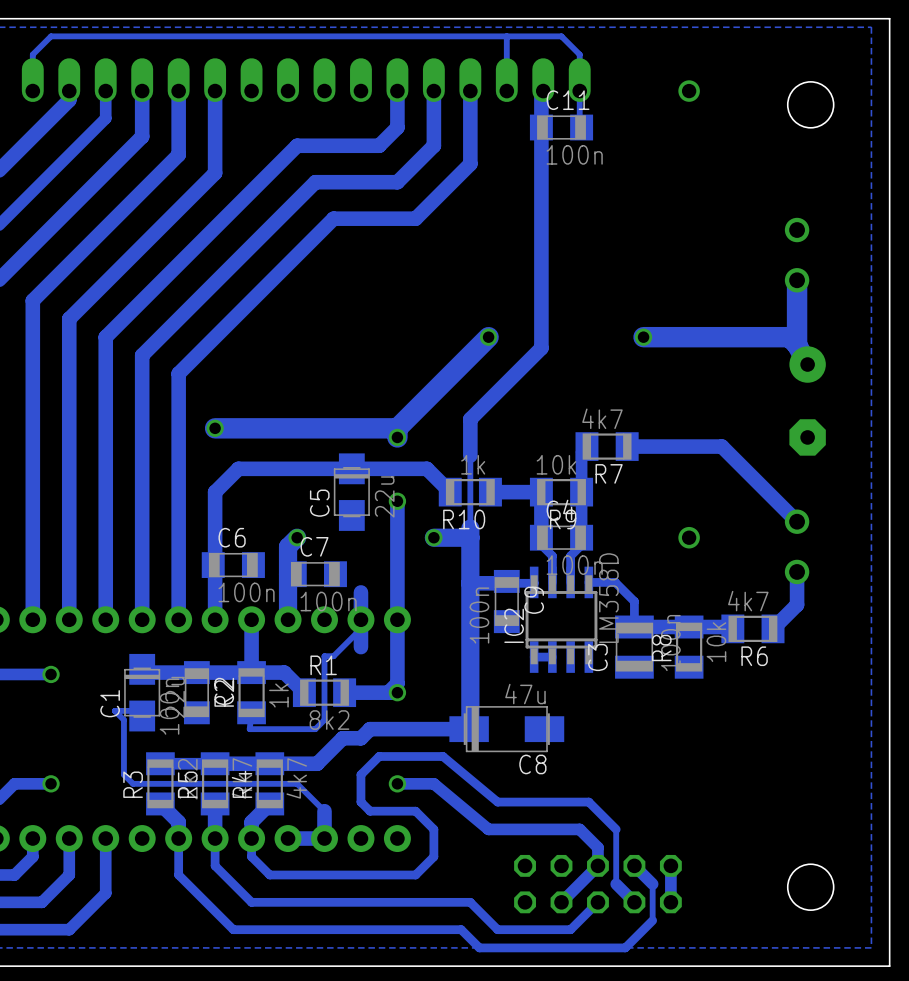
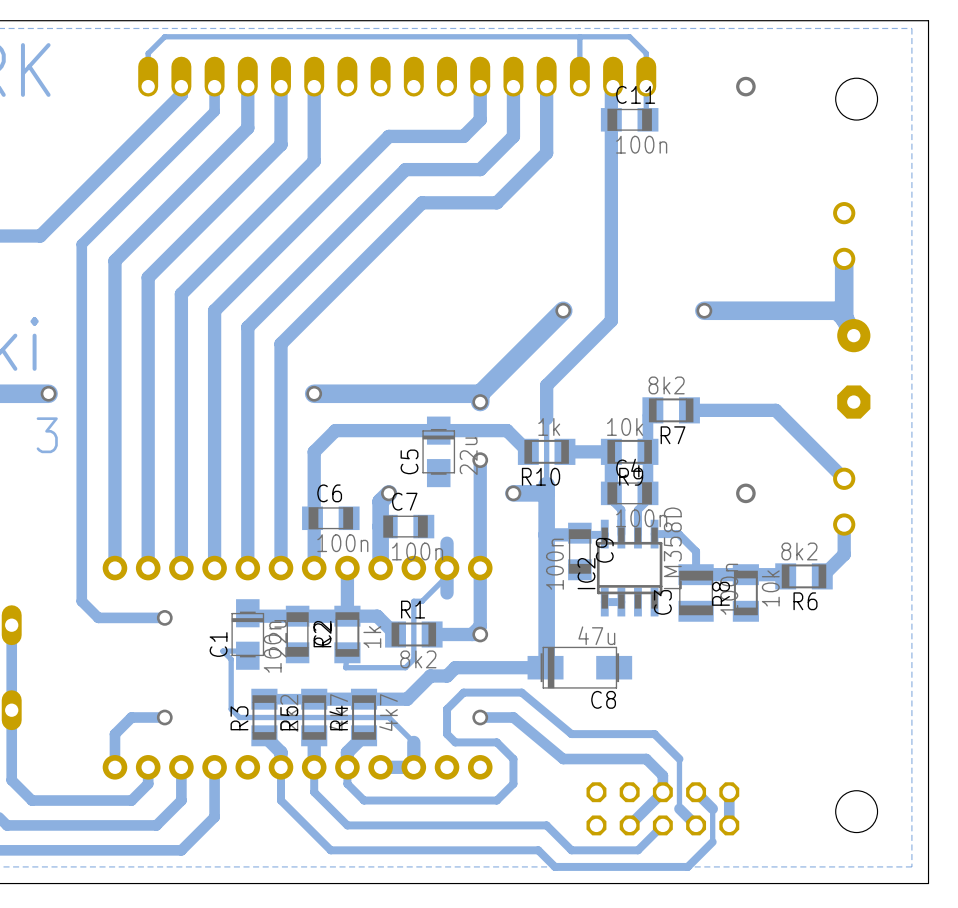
R7 value: 4k7 (602, 418) -> 8k2 (666, 385)
R6 value: 4k7 (748, 601) -> 8k2 (799, 551)

